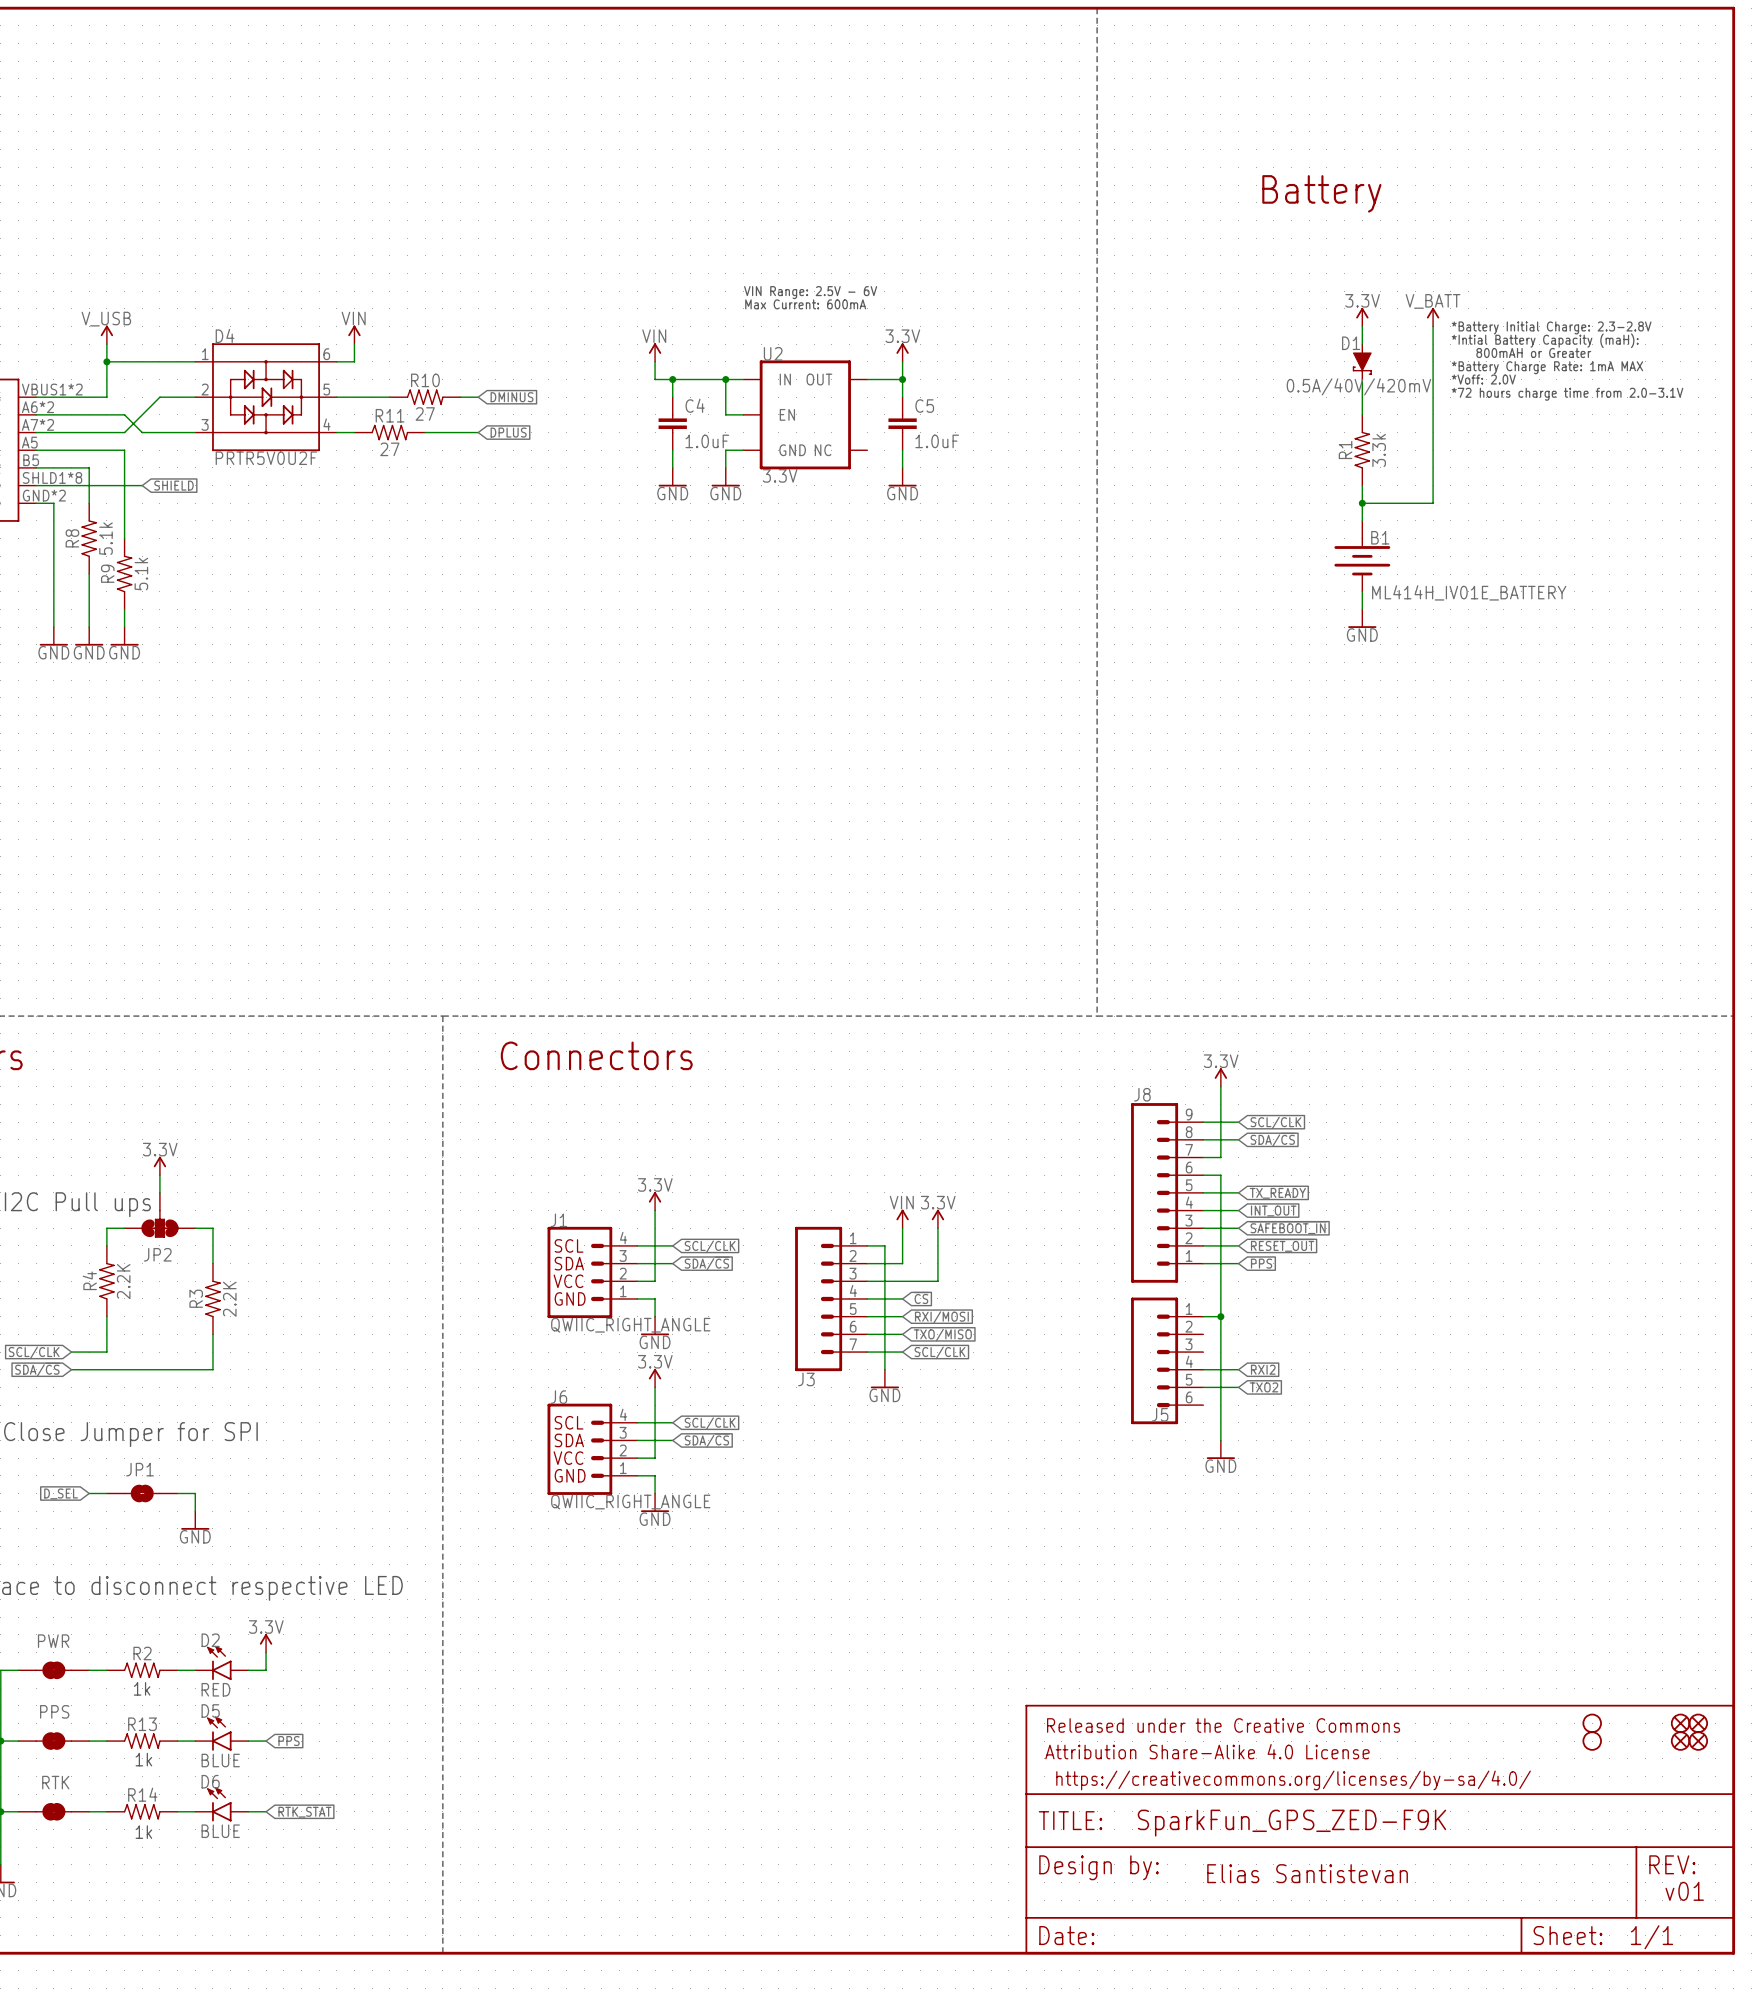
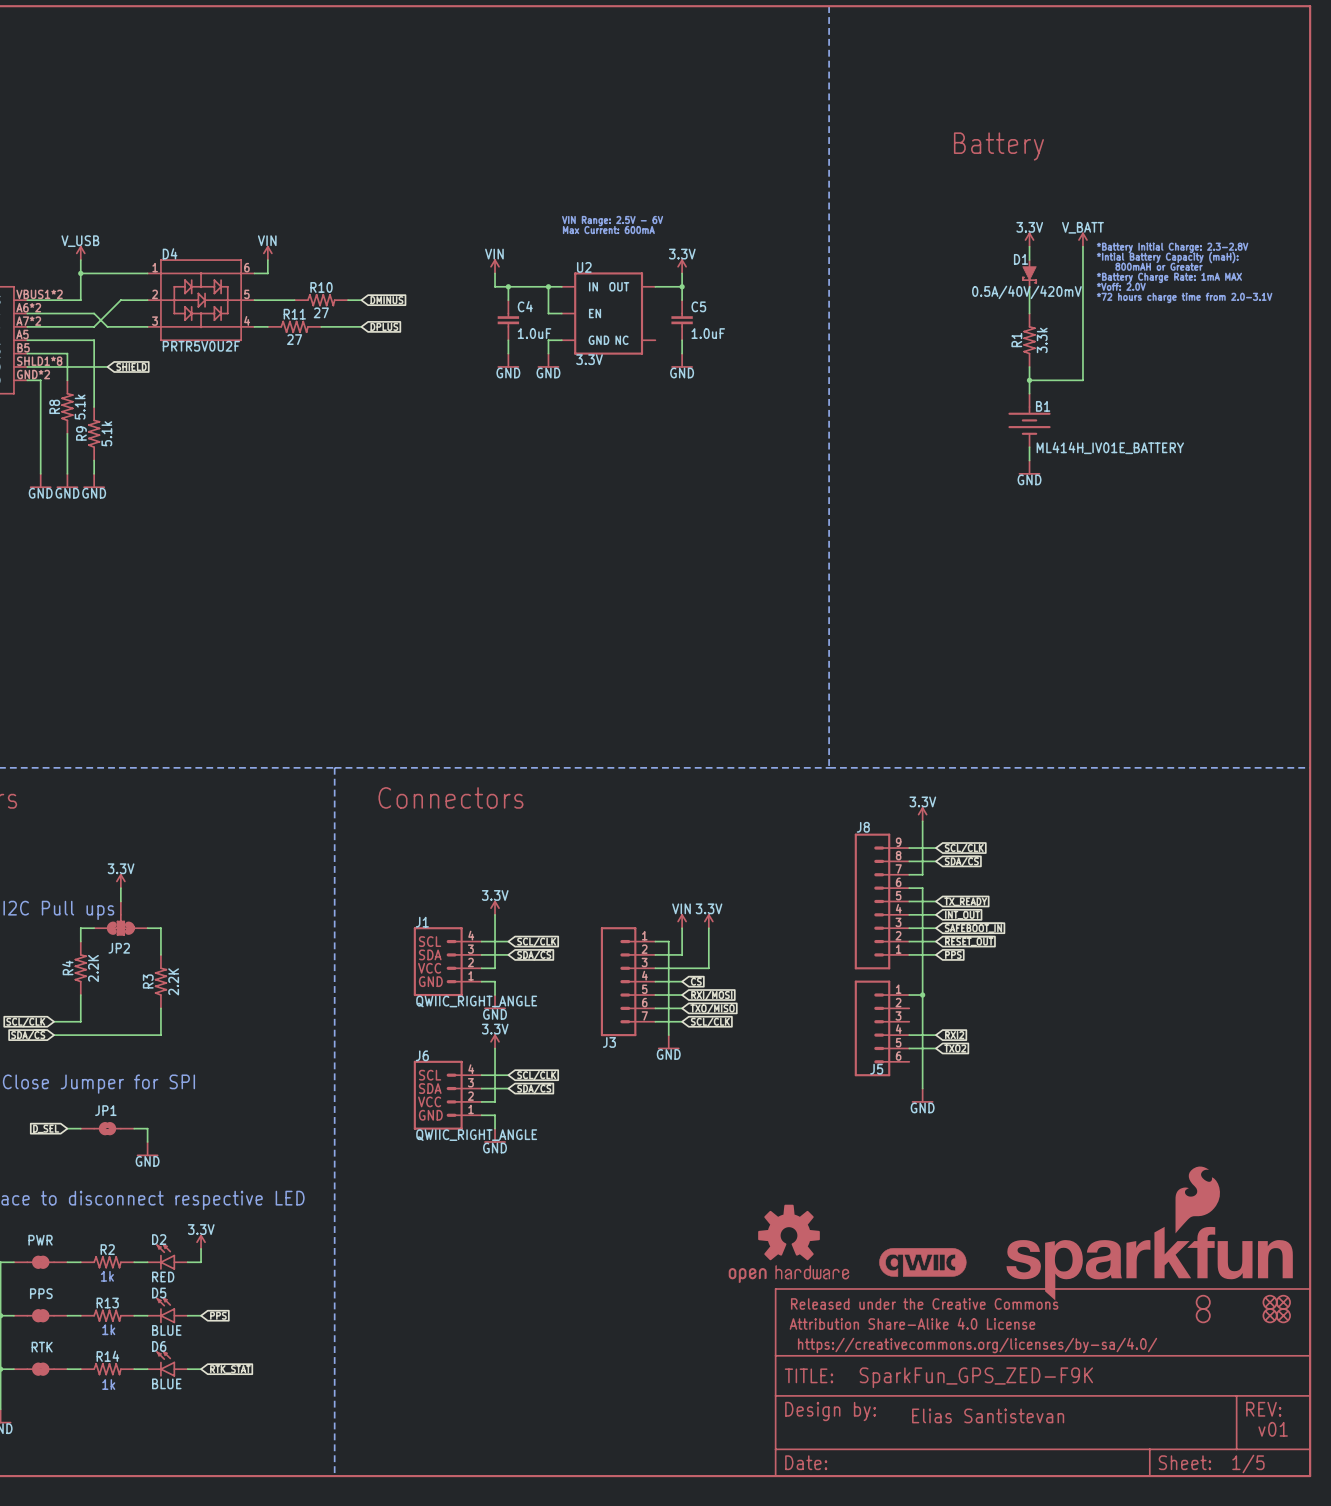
part: none -> (1149, 1233)
part: none -> (788, 1243)
part: none -> (922, 1262)
part text: 1/1 (1651, 1937) -> 1/5 (1248, 1463)

